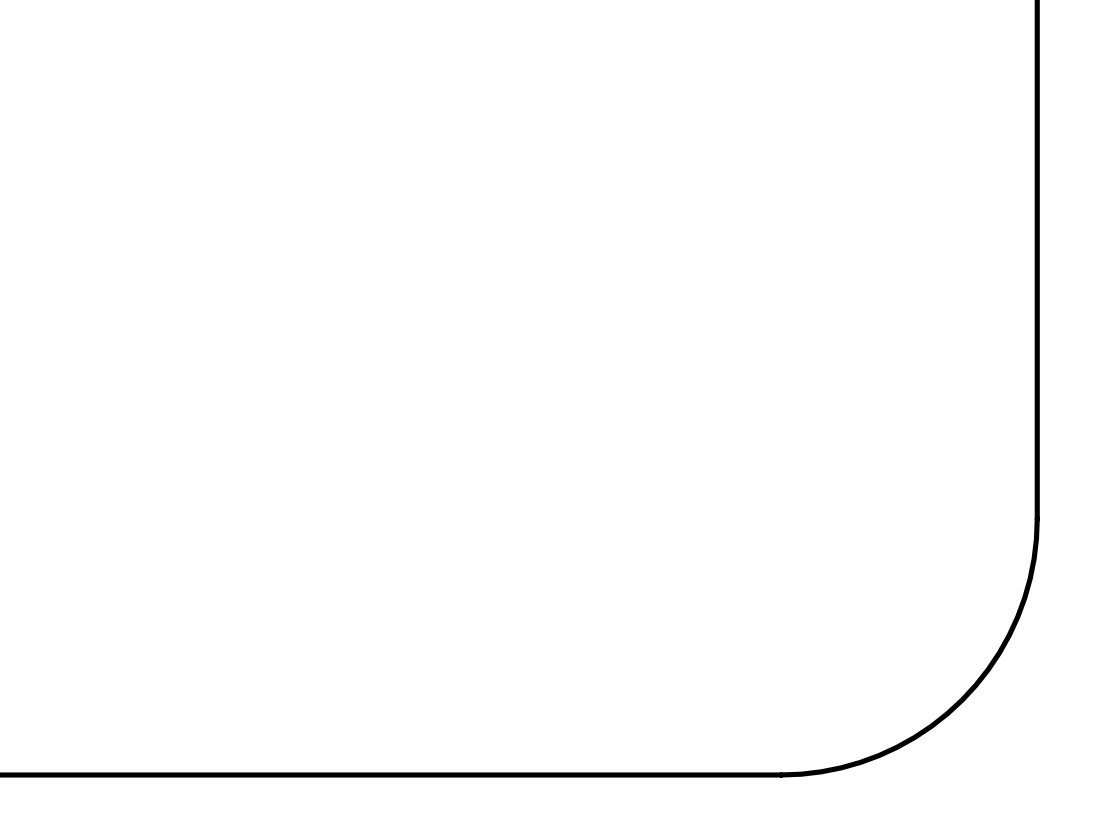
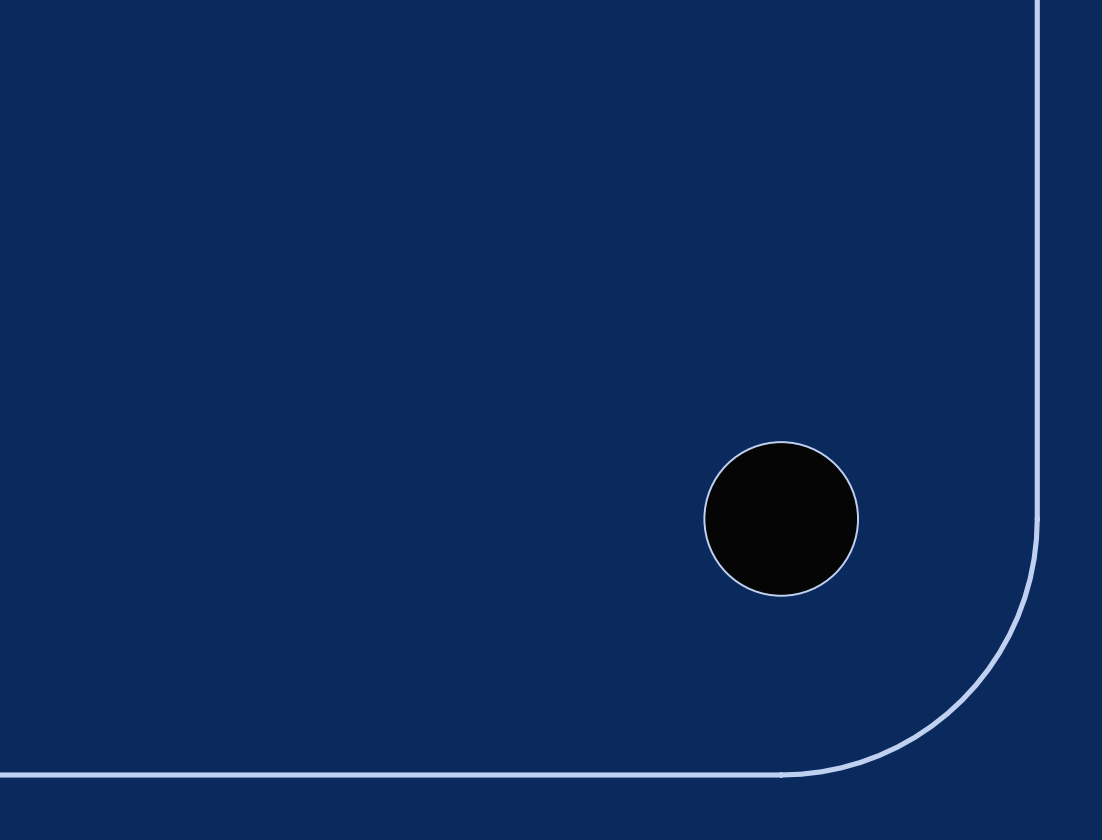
hole: none -> (781, 518)

